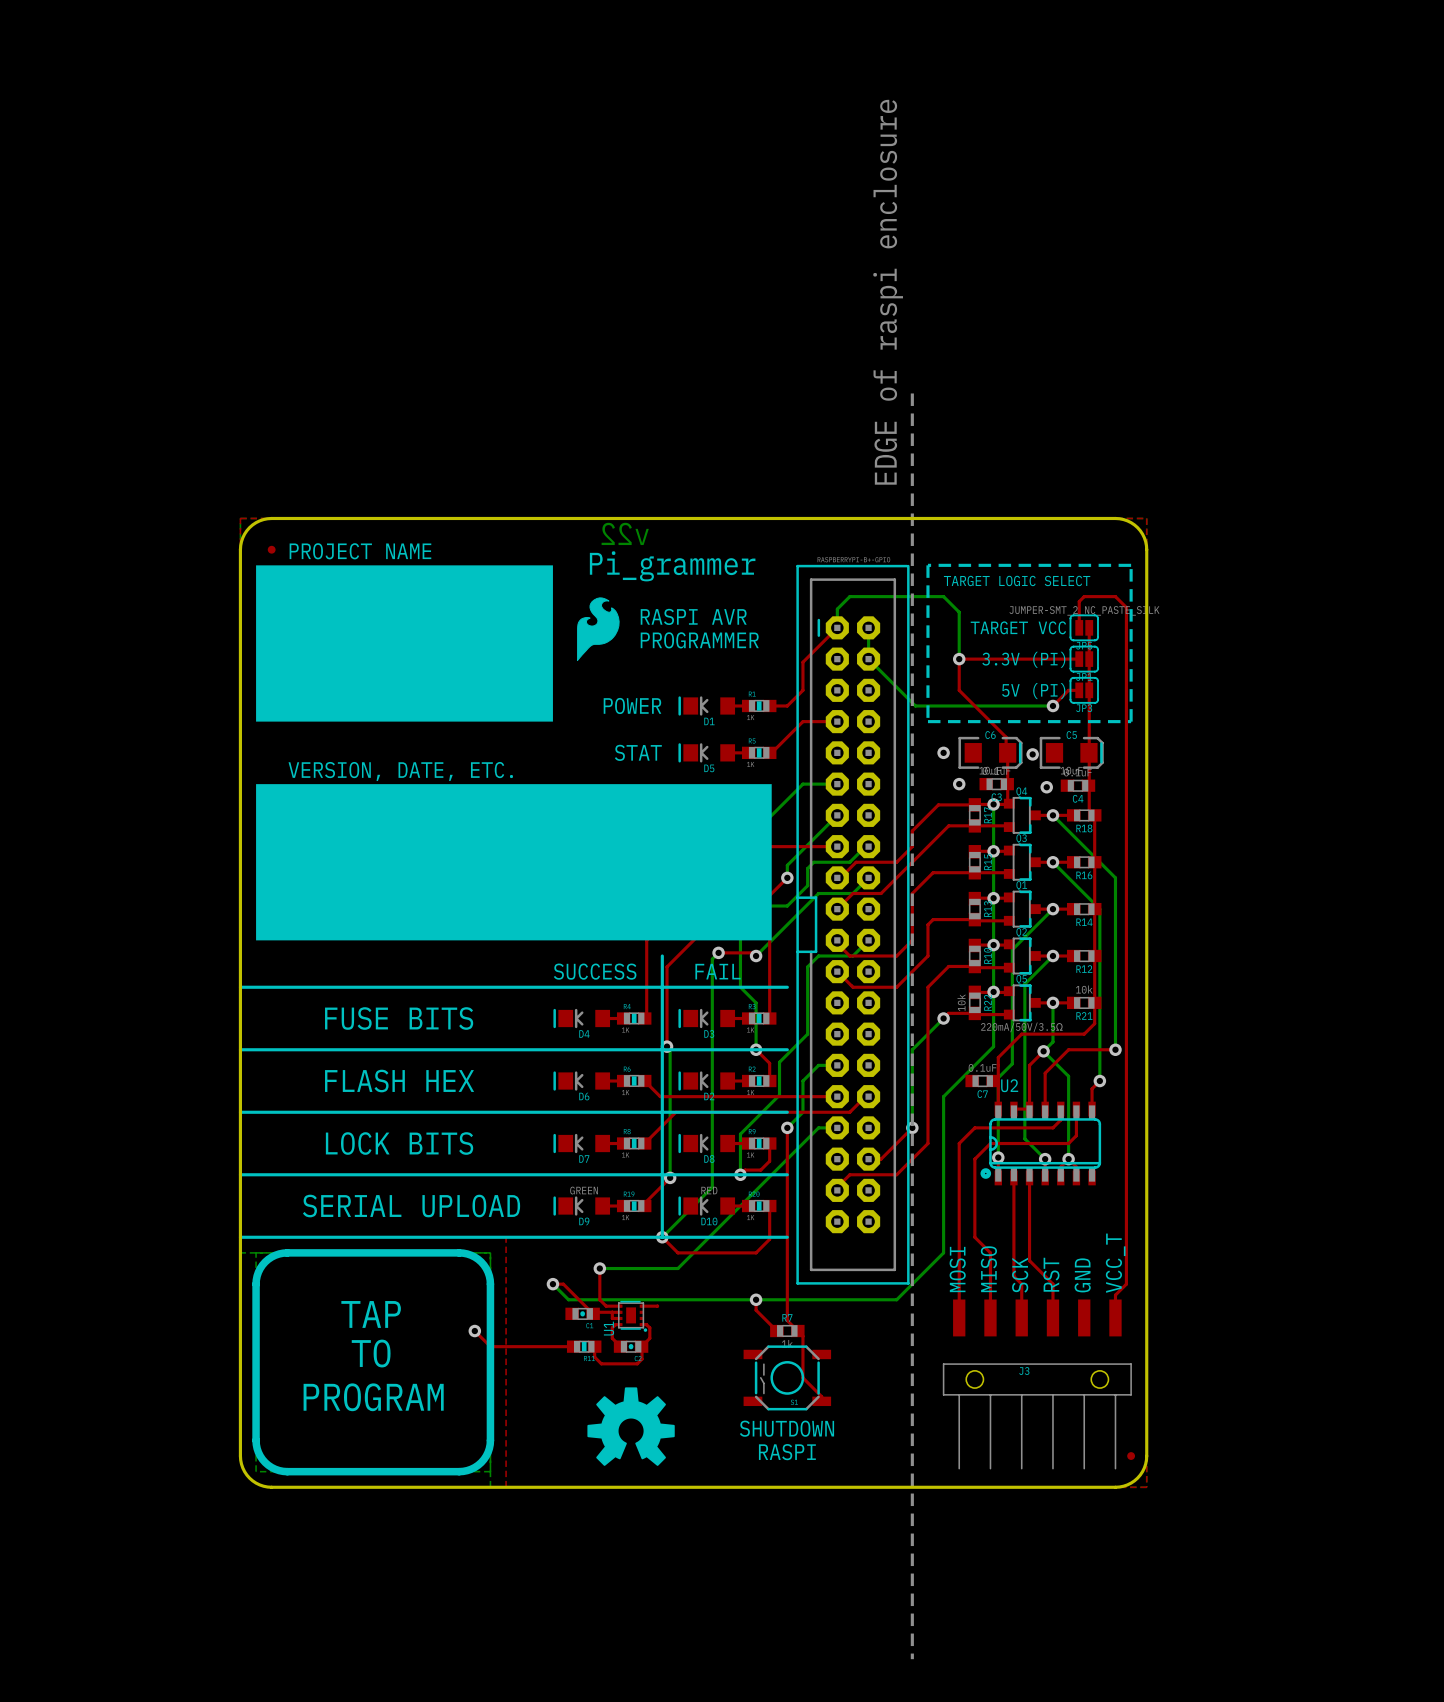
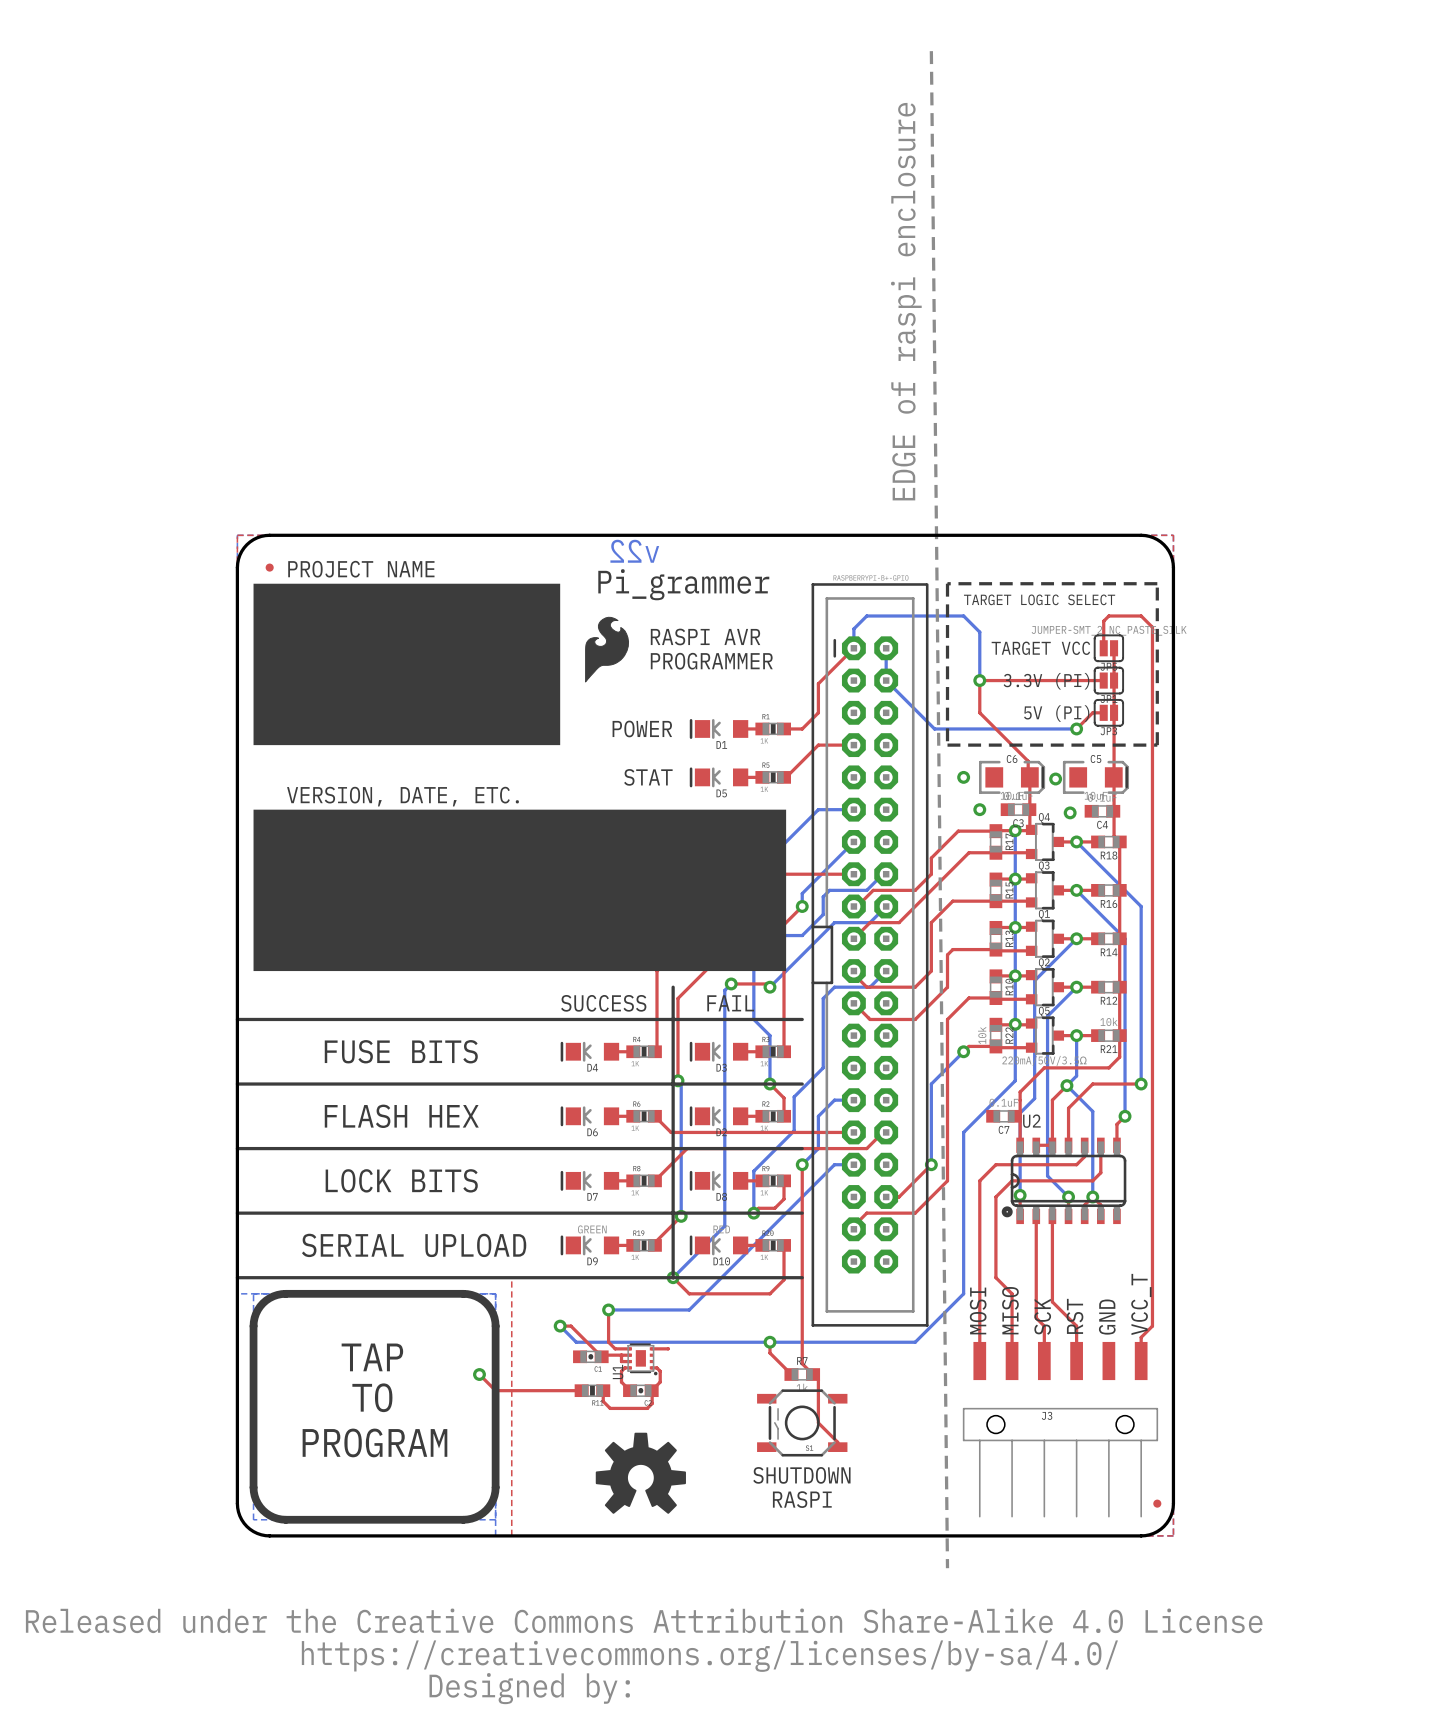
line: none -> (931, 51) (947, 1568)
line: (912, 393) (912, 1659) -> none
drawing: none -> [25, 1608, 1263, 1705]

